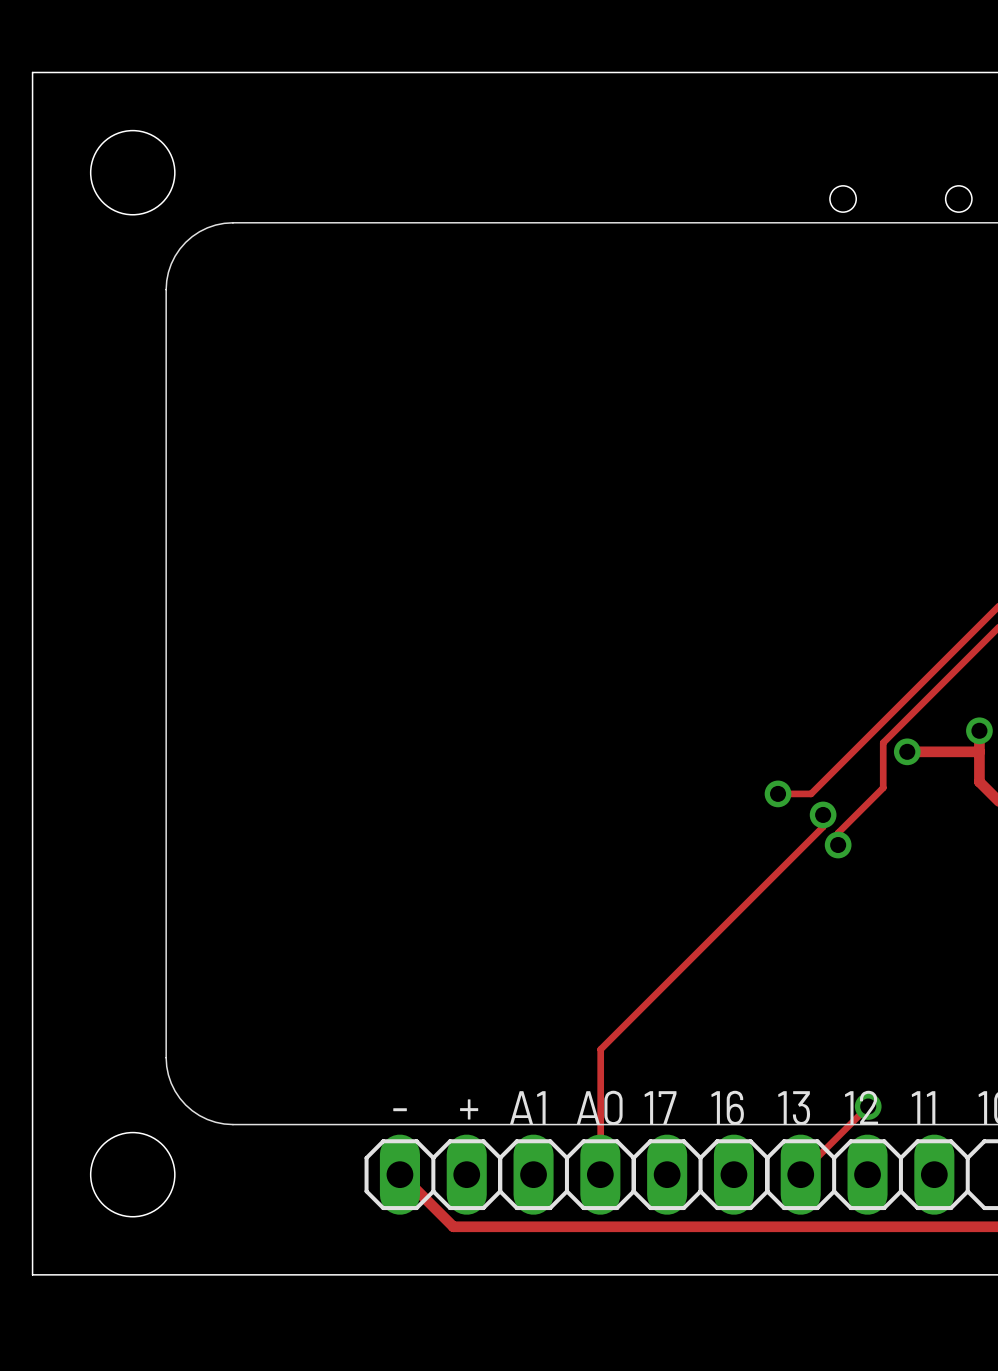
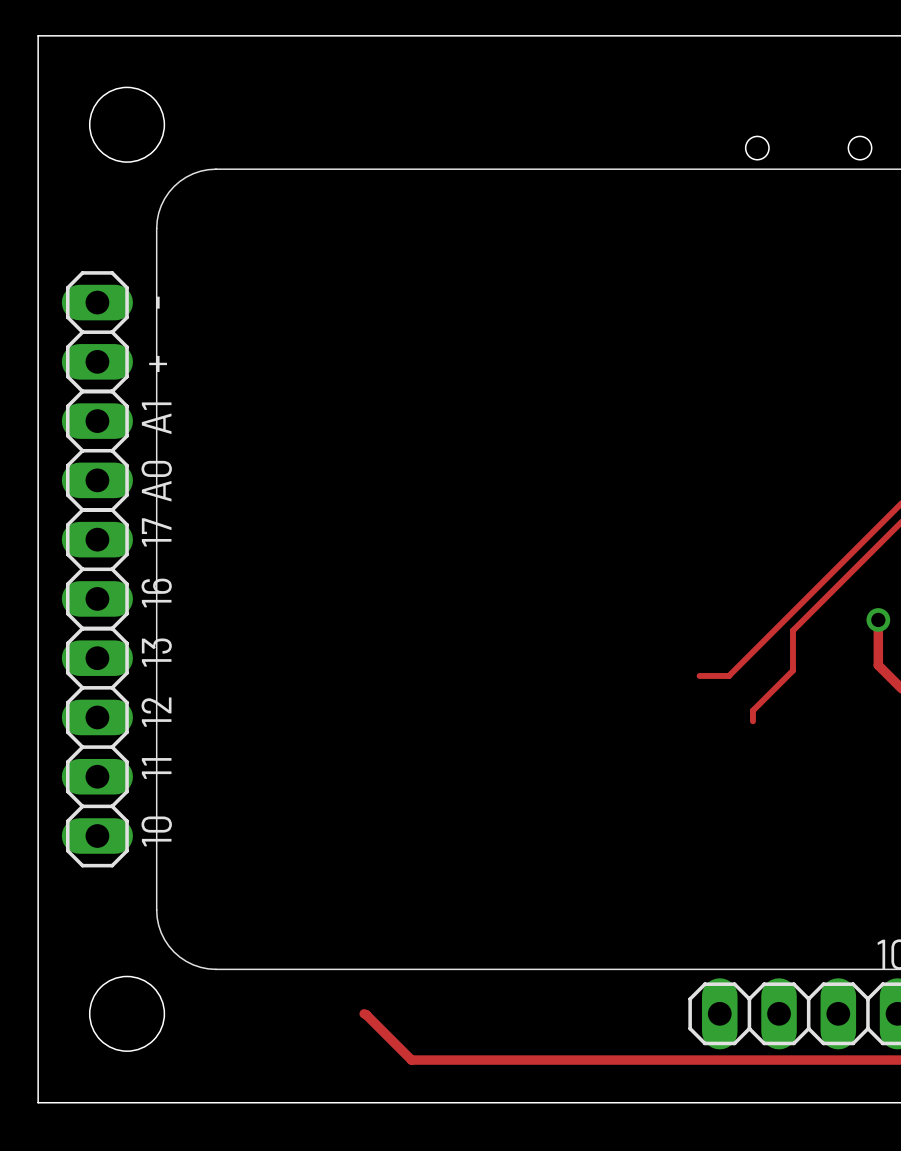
text: none -> - (158, 302)
part: none -> (97, 332)
text: none -> + (158, 363)
text: none -> A1 (156, 418)
part: none -> (97, 450)
text: none -> A0 (156, 481)
text: none -> 17 (156, 532)
part: none -> (97, 569)
text: none -> 16 (156, 593)
track: (907, 751) (979, 751) -> none
via: (907, 751) -> none
text: none -> 13 (156, 652)
via: (778, 793) -> none
track: (823, 814) (823, 826) (600, 1049) (600, 1174) -> none
via: (823, 814) -> none
text: none -> 12 (156, 712)
via: (838, 845) -> none
part: none -> (97, 747)
text: none -> 11 (156, 768)
text: none -> 10 (156, 831)
track: (868, 1106) (800, 1174) -> none
via: (868, 1106) -> none
text: A1 (527, 1107) -> none
text: A0 (599, 1107) -> none
text: 17 (660, 1107) -> none
text: 16 (727, 1107) -> none
text: 12 (861, 1107) -> none
text: 11 (923, 1107) -> none
text: 13 (794, 1108) -> none
text: - (400, 1109) -> none
text: + (469, 1109) -> none
part: (433, 1174) -> none
part: (566, 1174) -> none
part: (700, 1174) -> none

